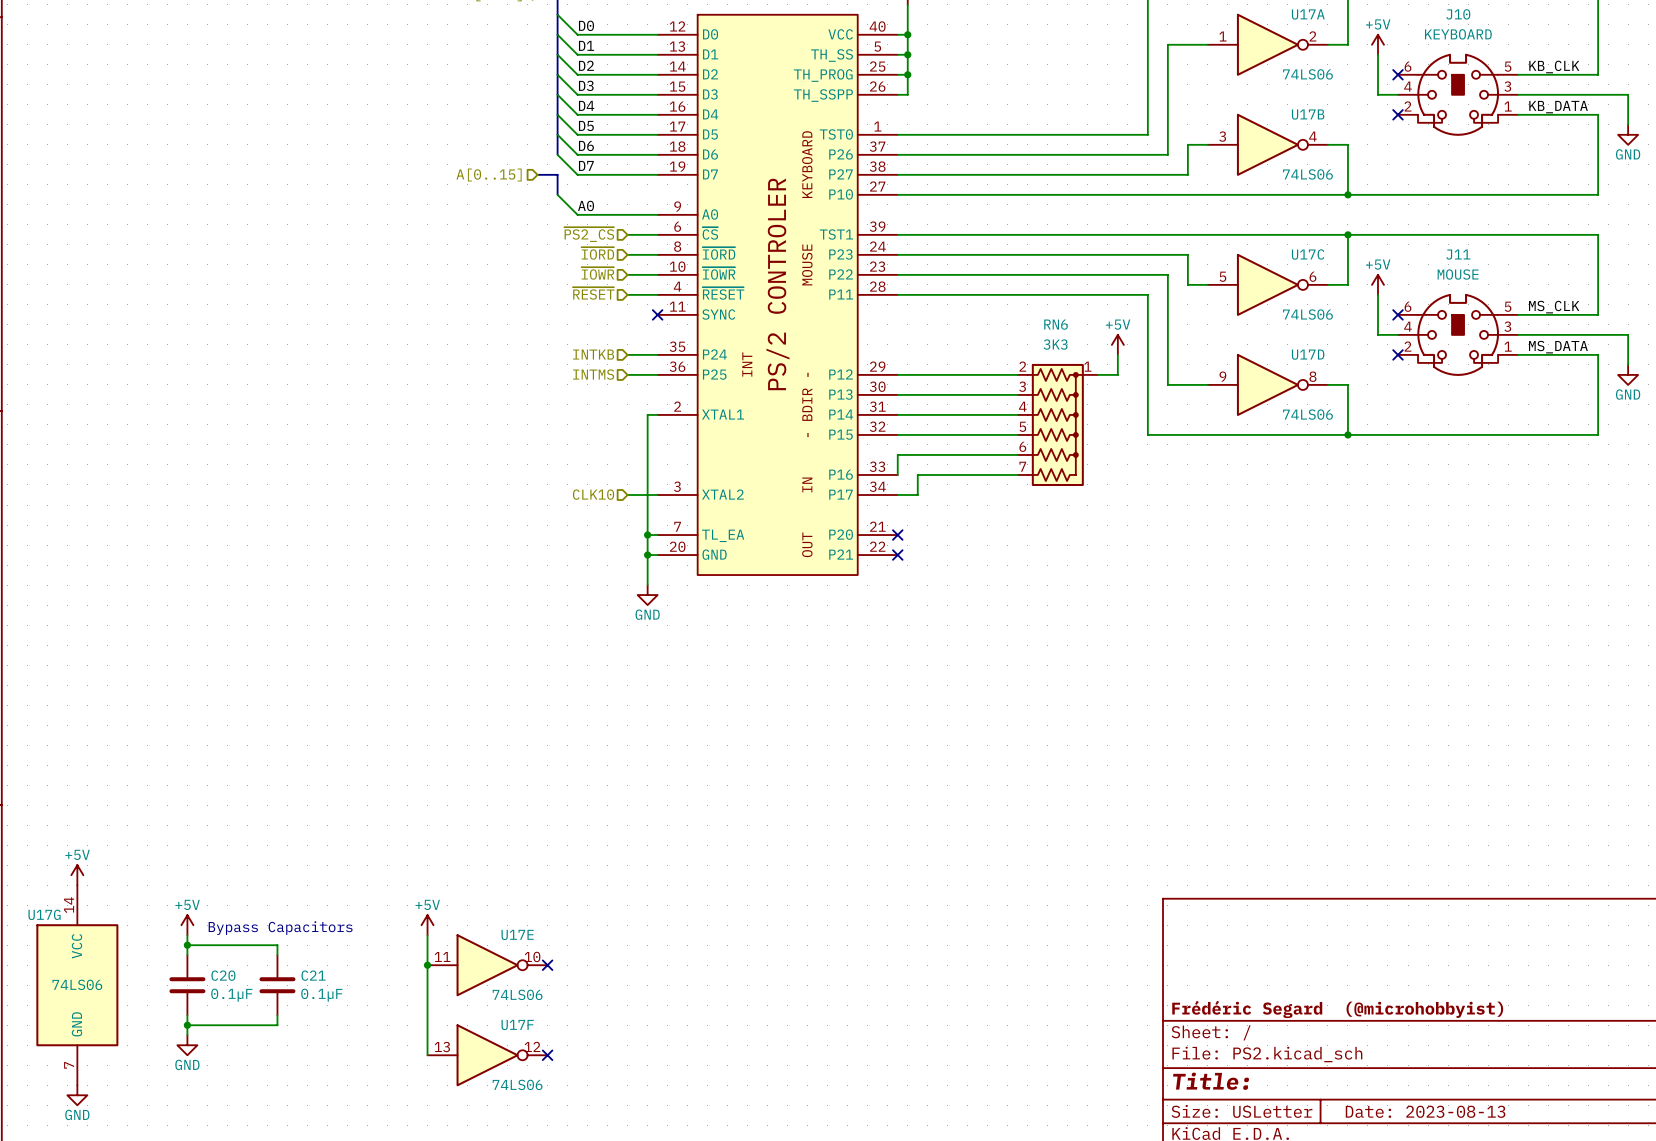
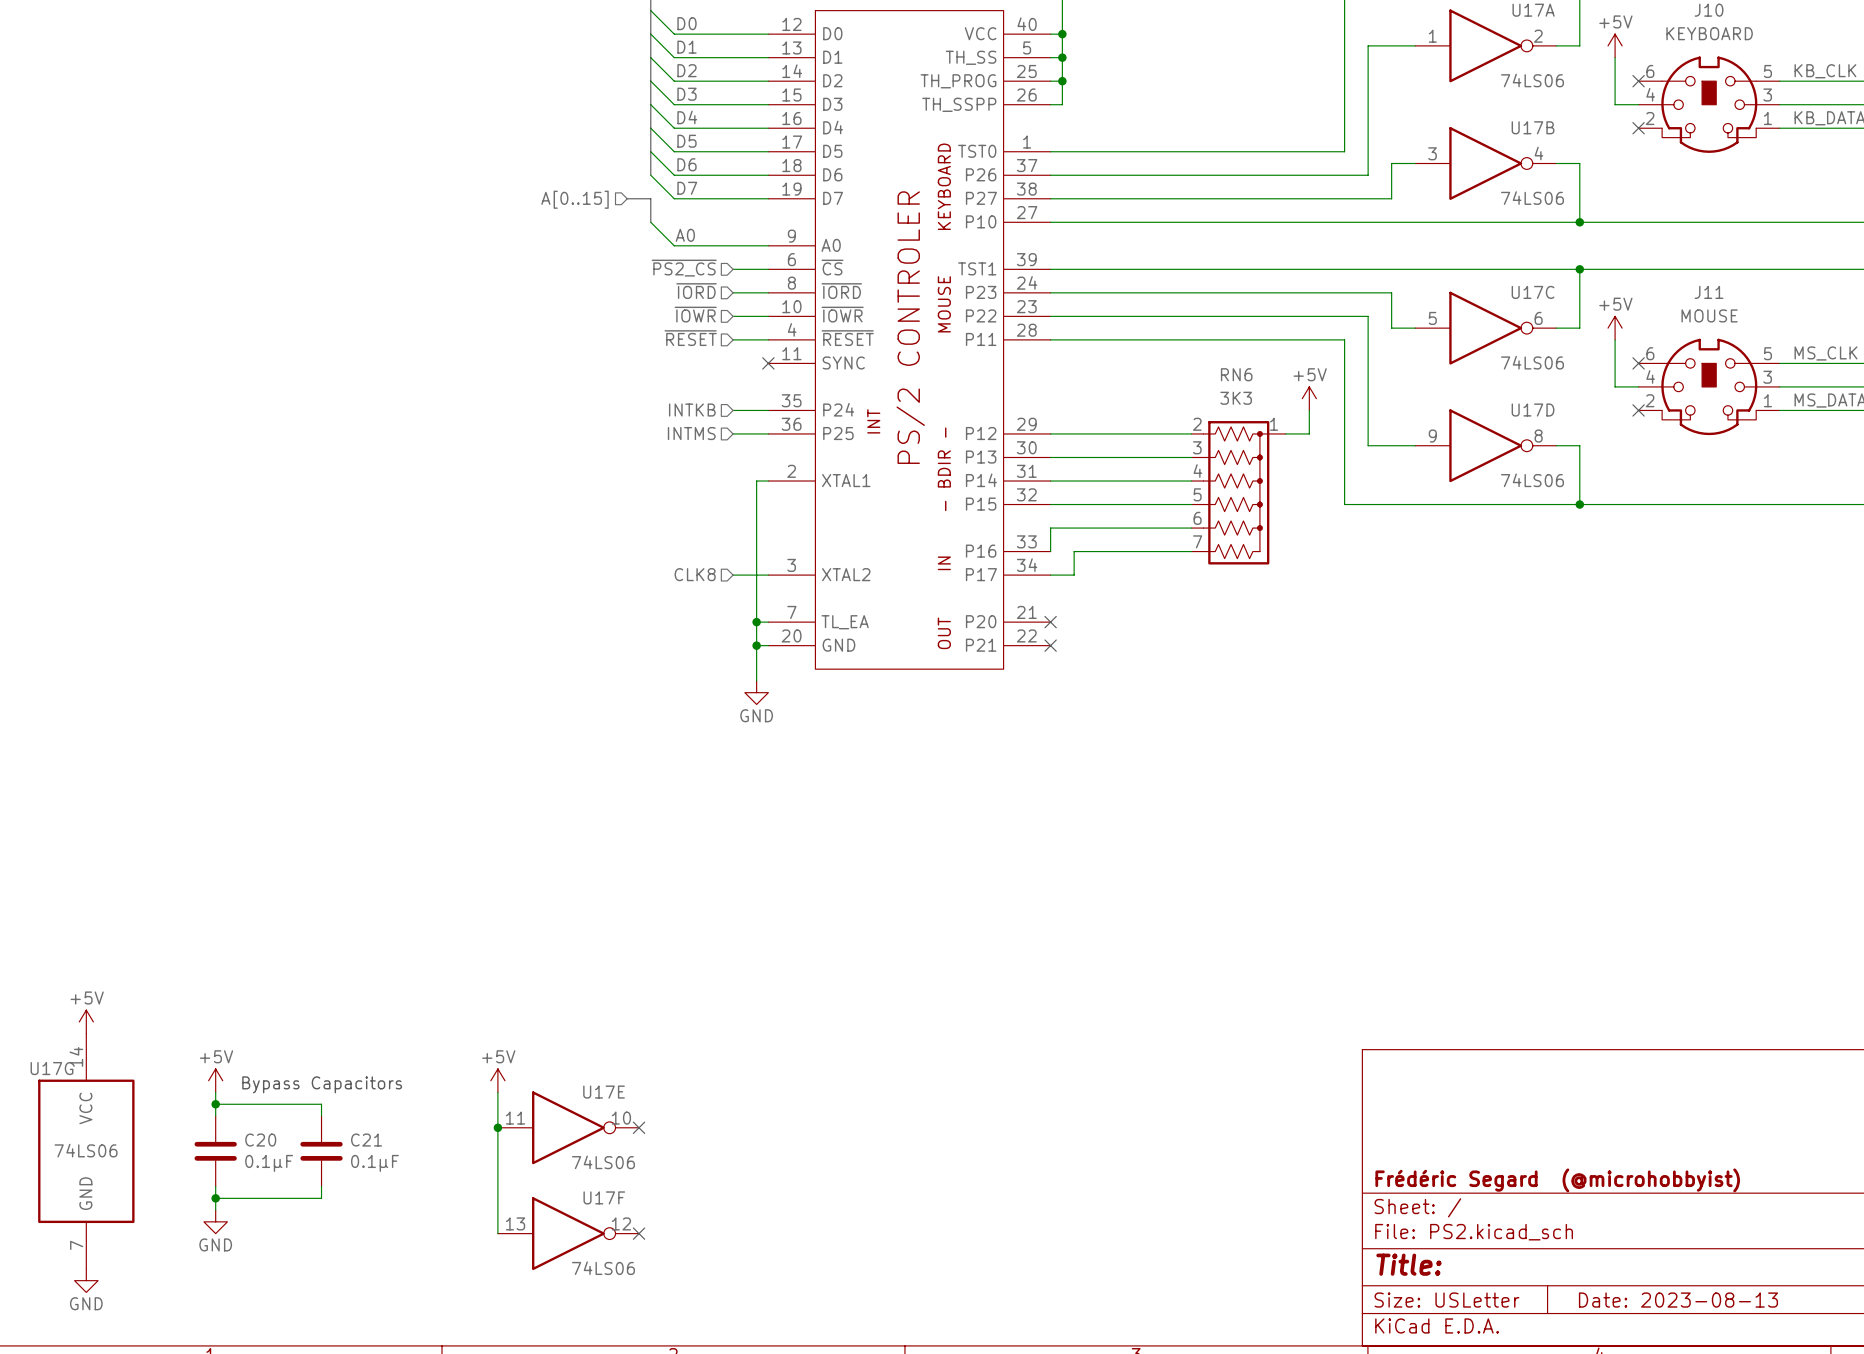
hierarchical label: CLK10 (593, 494) -> CLK8 (695, 574)

